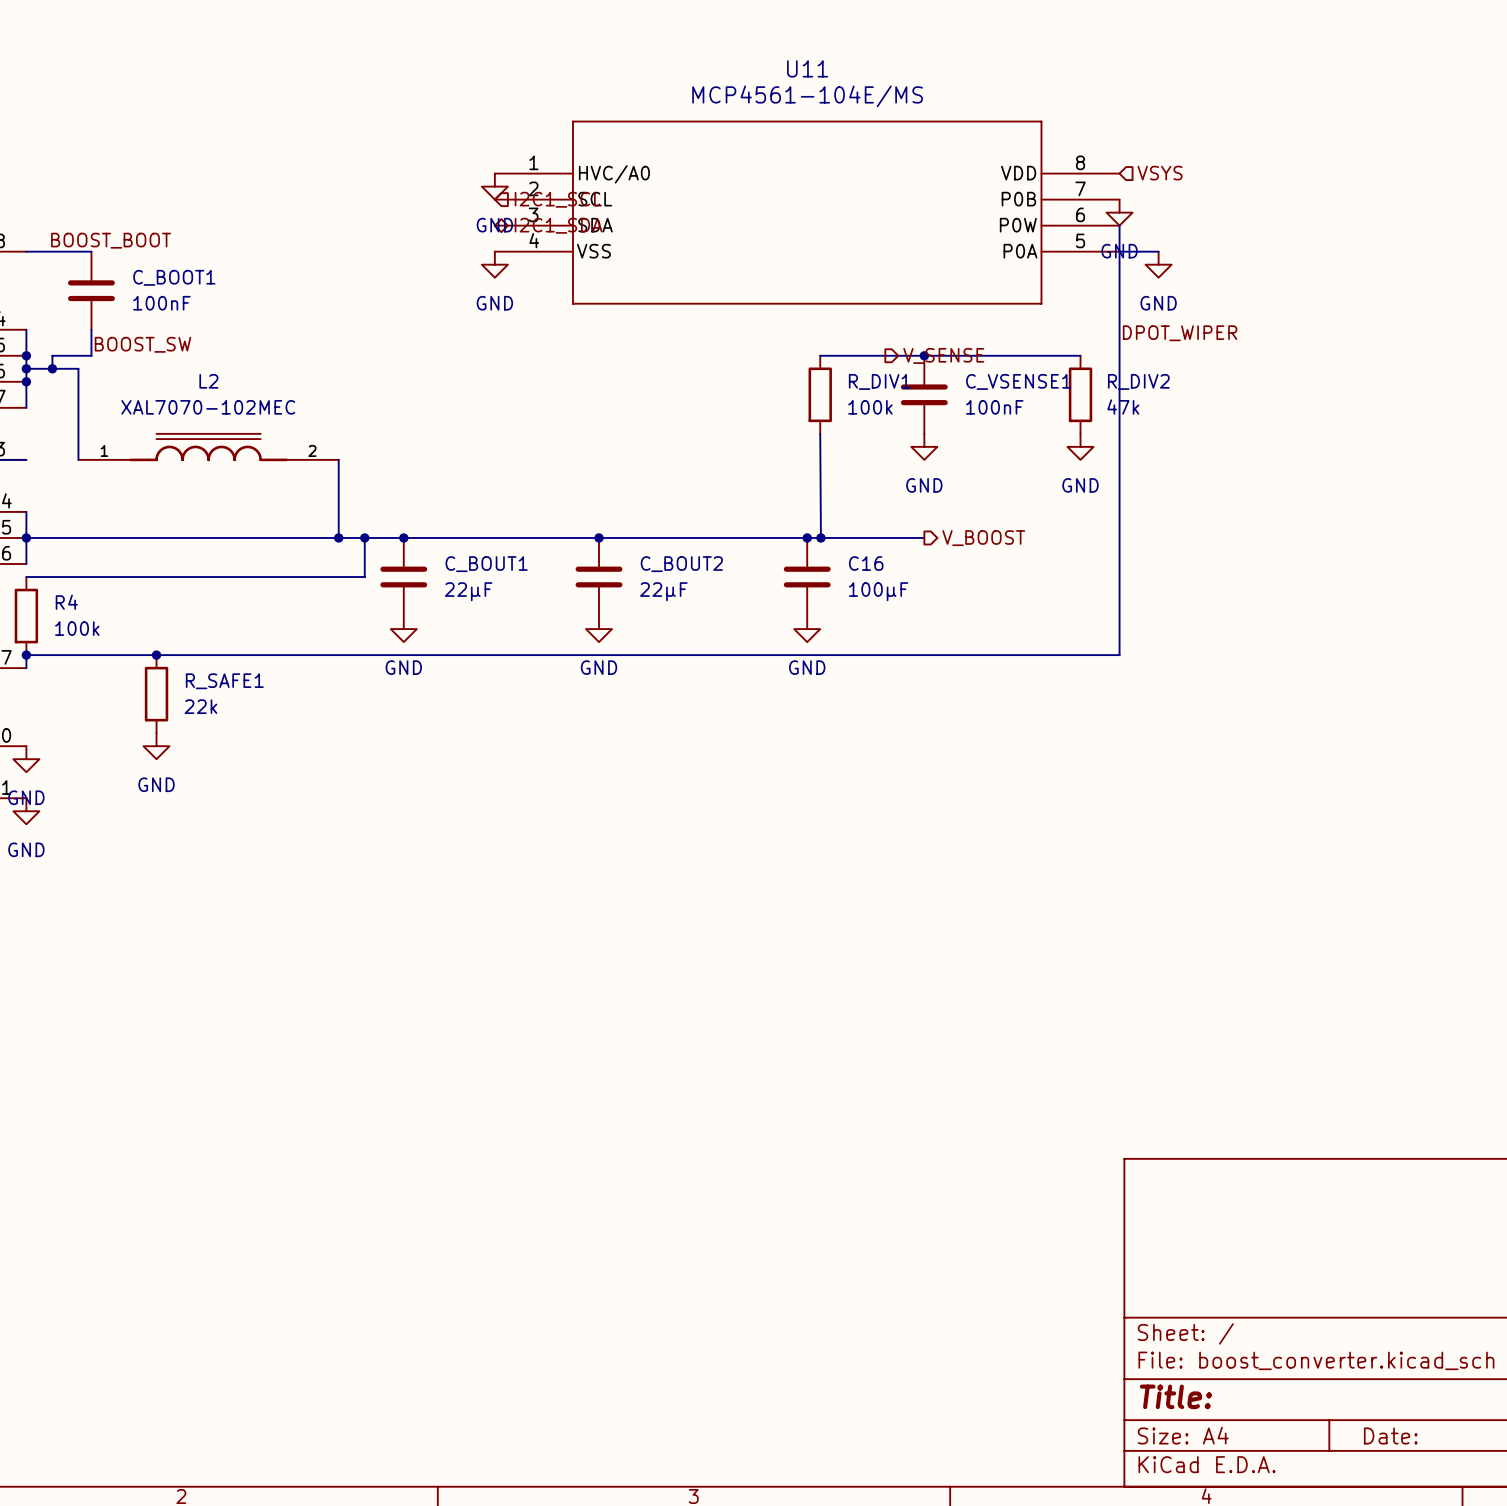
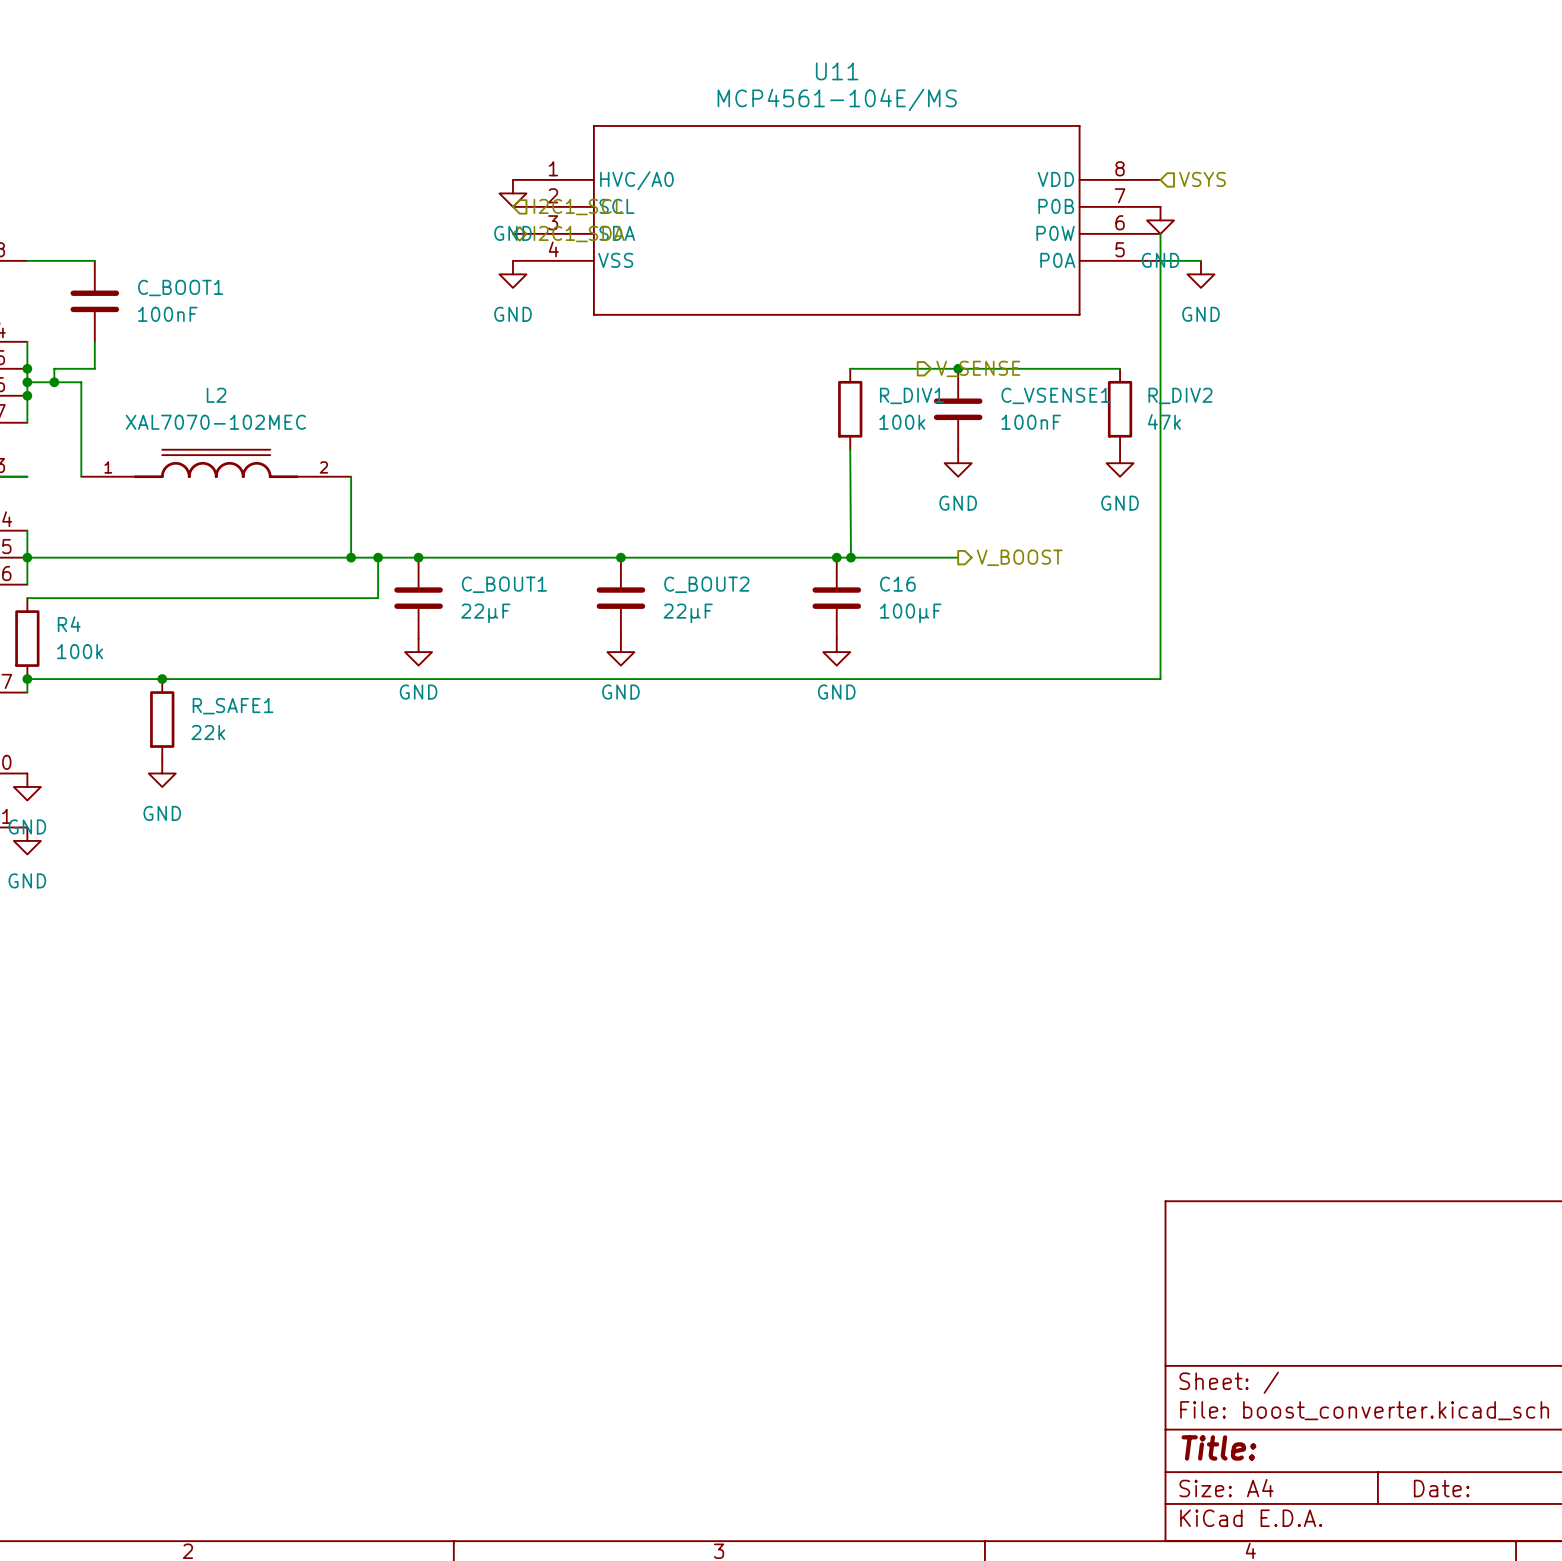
label: BOOST_BOOT (111, 240) -> none
label: DPOT_WIPER (1180, 333) -> none
label: BOOST_SW (143, 344) -> none

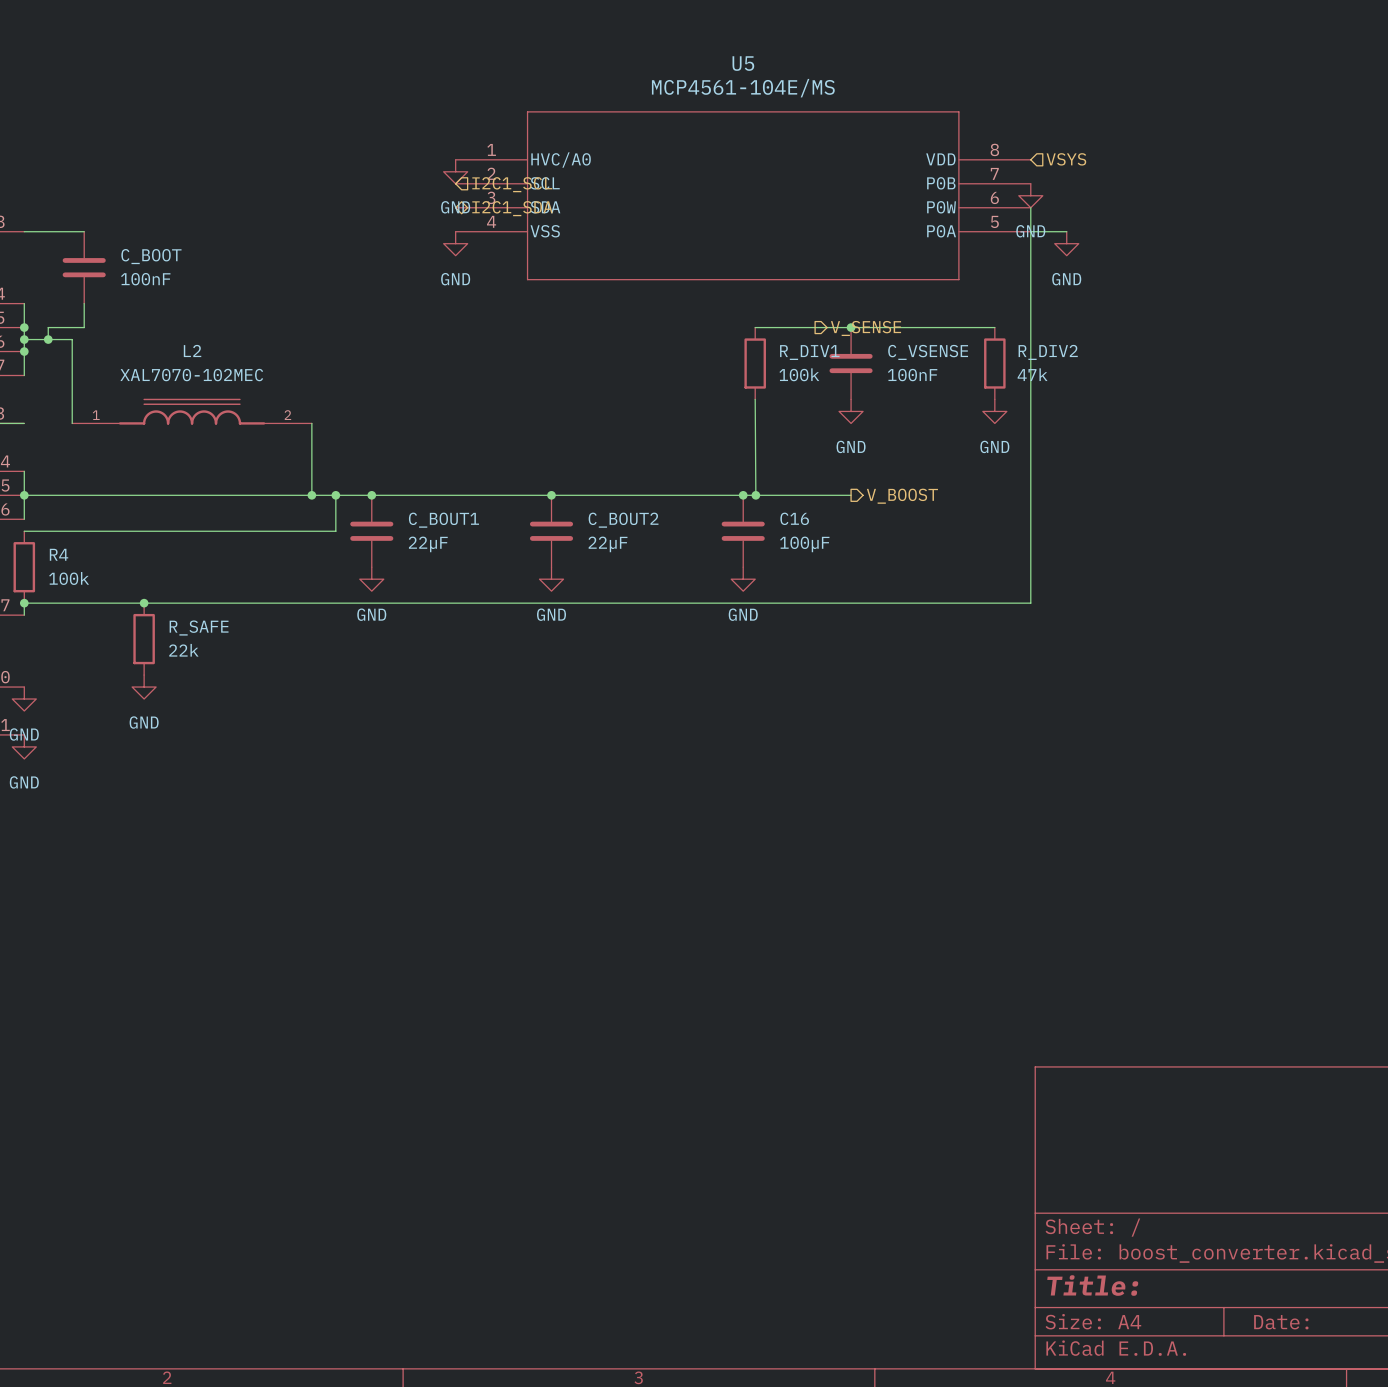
U11 name: U11 (837, 71) -> U5 (743, 63)
C_BOOT1 name: C_BOOT1 (180, 287) -> C_BOOT (151, 256)
C_VSENSE1 name: C_VSENSE1 (1055, 395) -> C_VSENSE (928, 352)
R_SAFE1 name: R_SAFE1 (233, 706) -> R_SAFE (199, 628)

